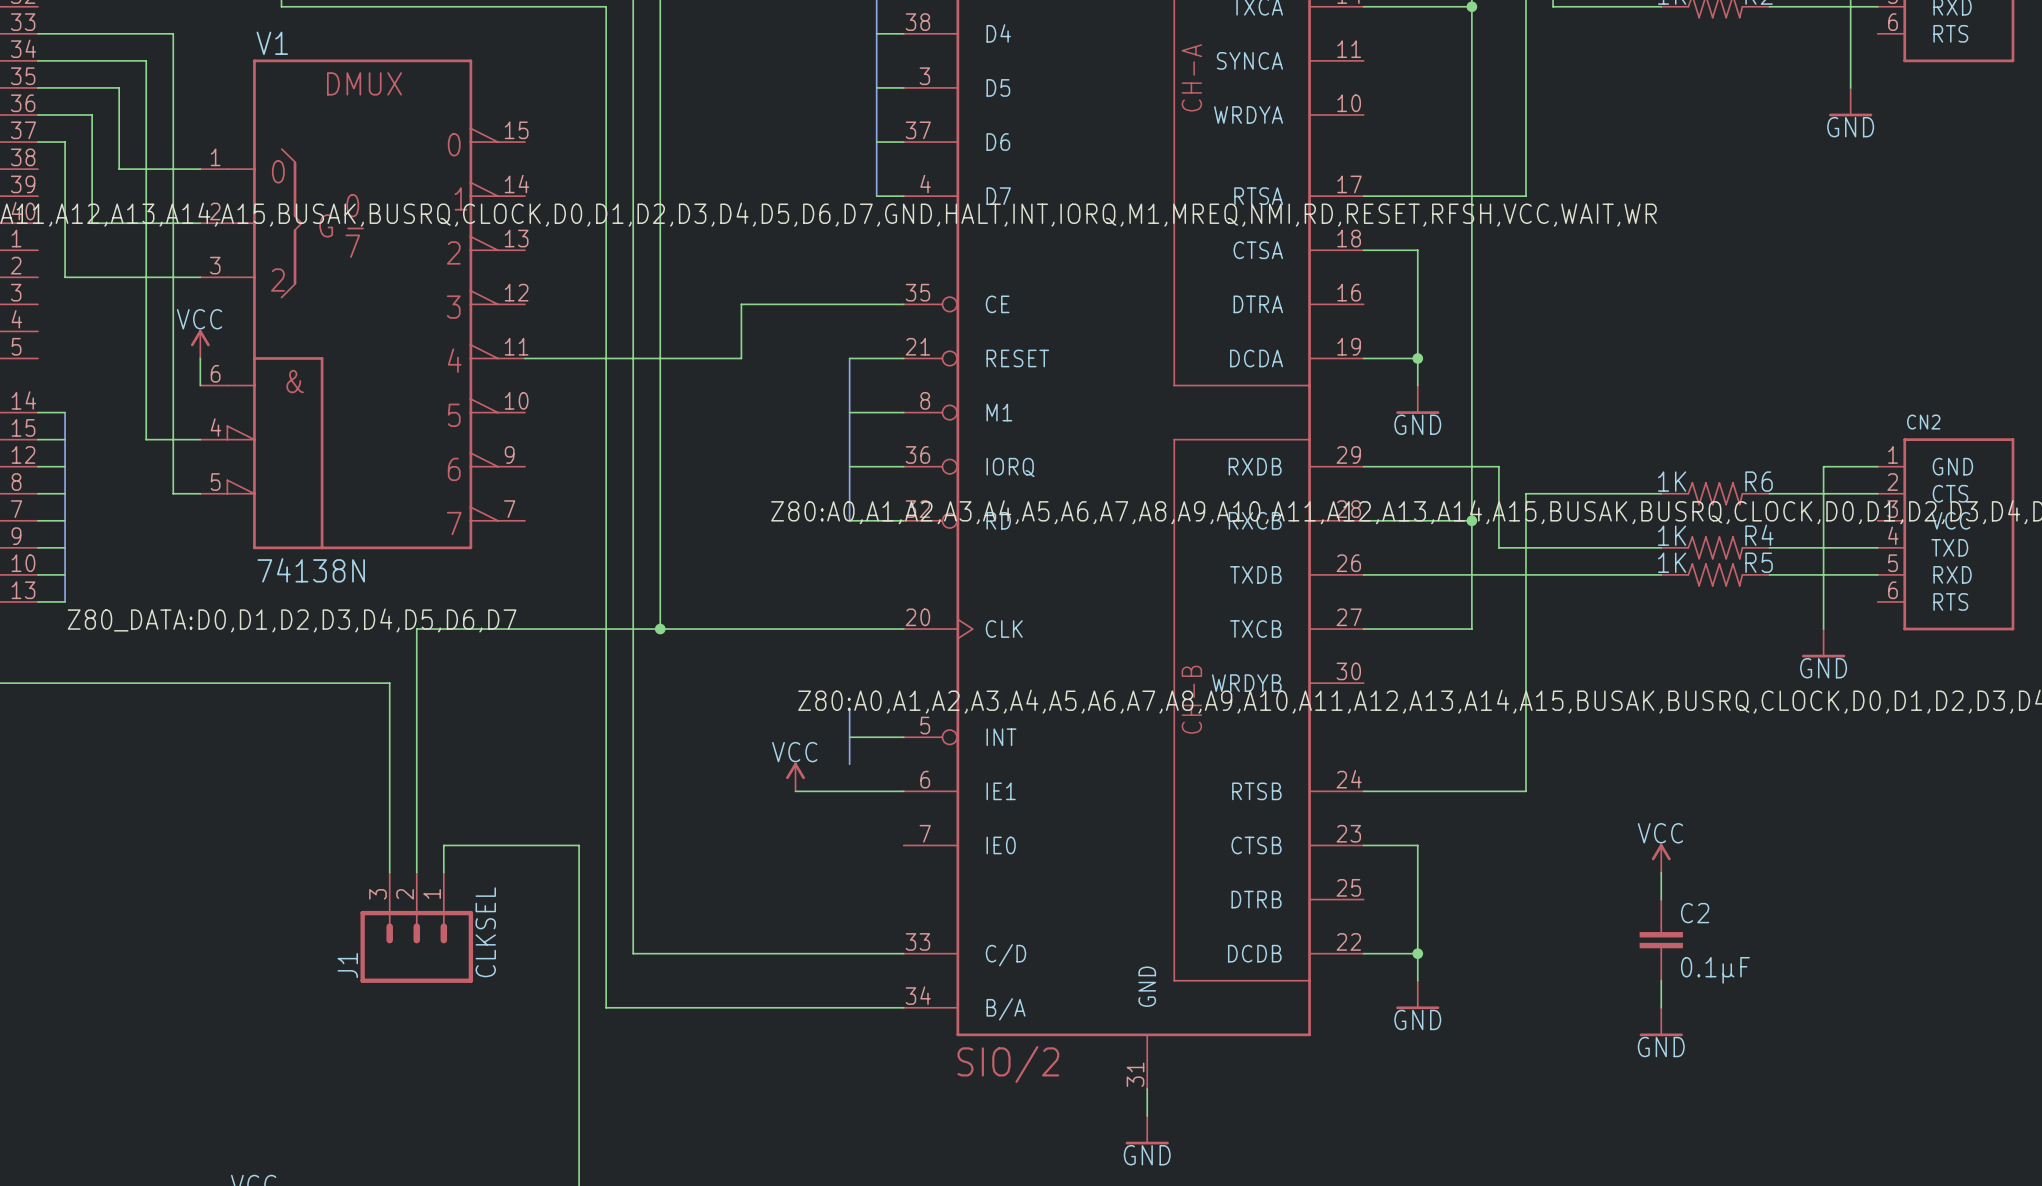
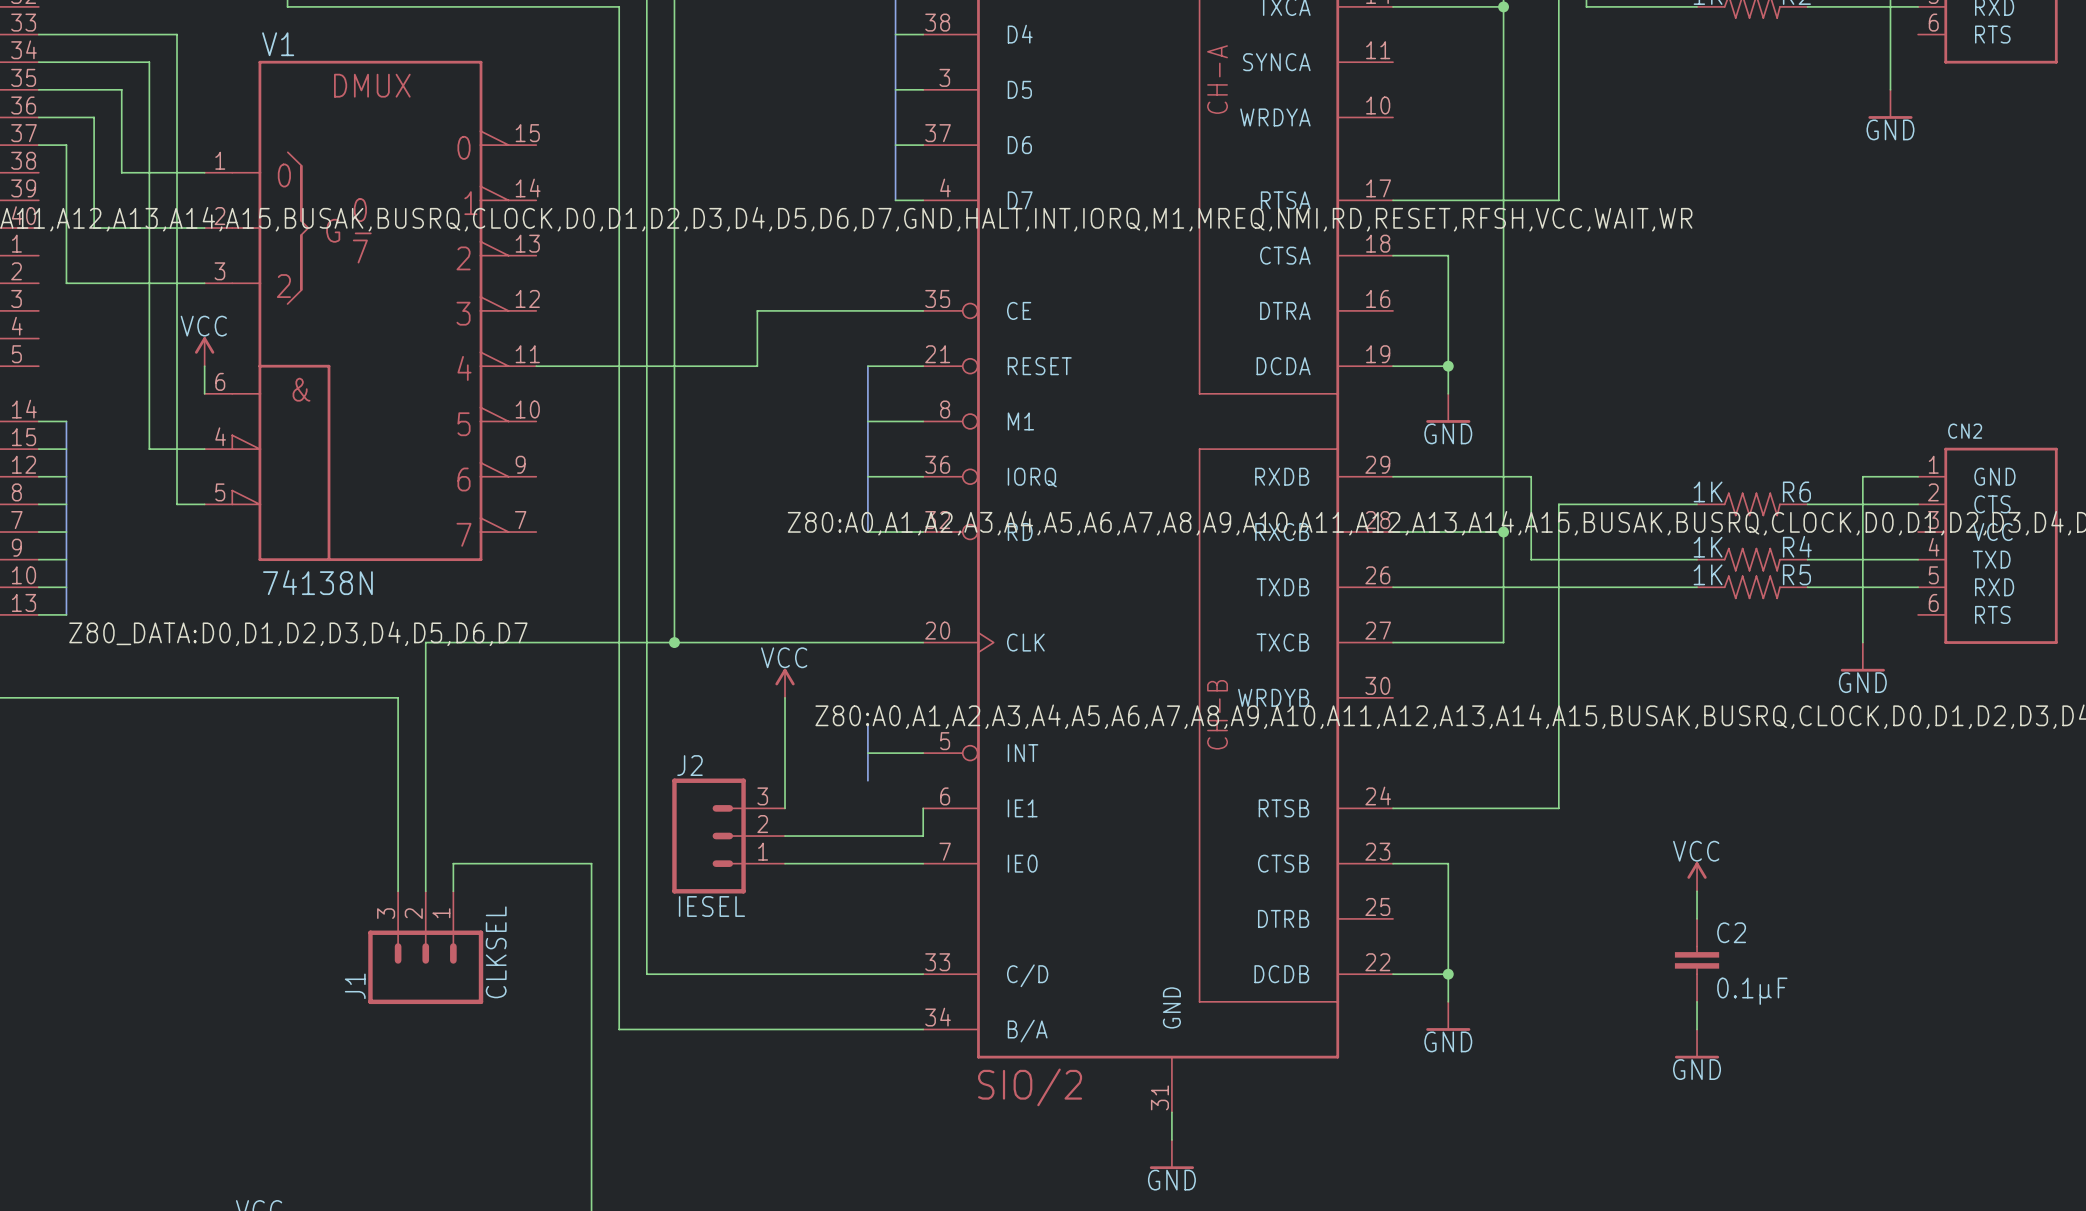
wire: none -> (785, 697) (785, 808)
power symbol position: VCC (795, 777) -> VCC (785, 683)
wire: (795, 791) (903, 791) -> (785, 836) (923, 836) (923, 808)
J2: none -> IESEL (728, 836)
wire: none -> (785, 863) (923, 863)

